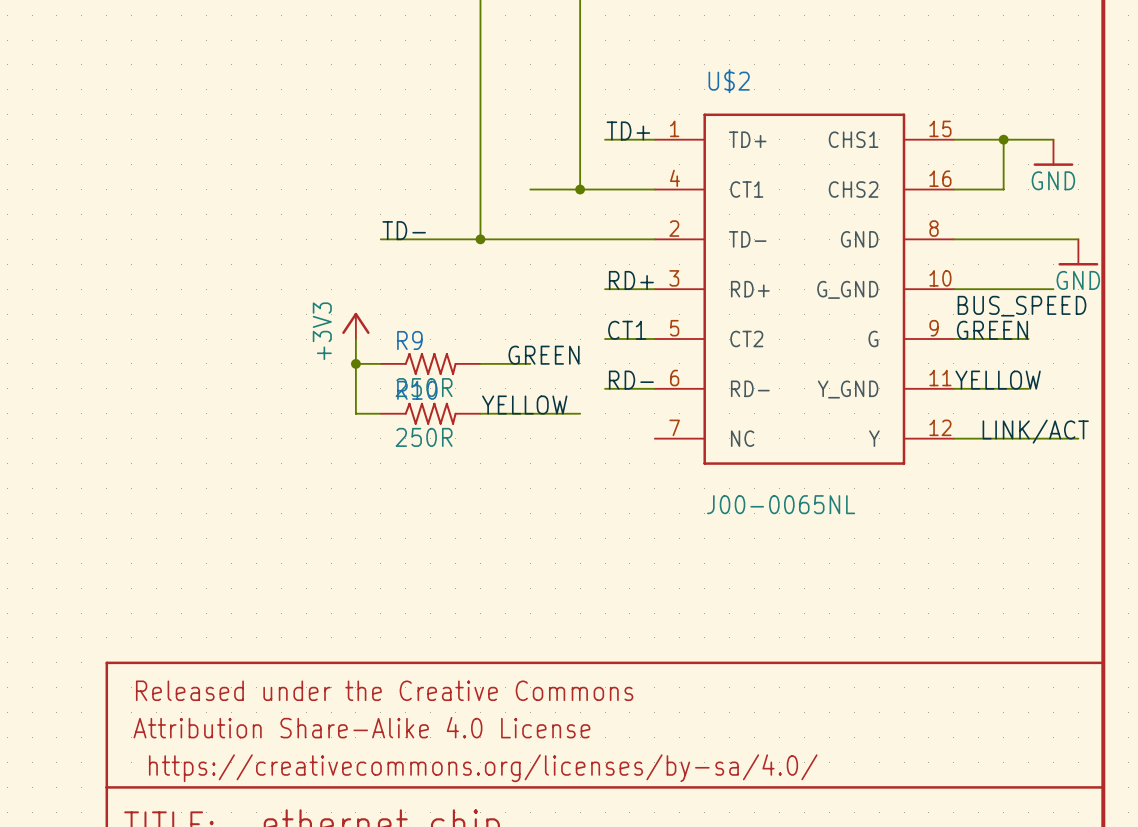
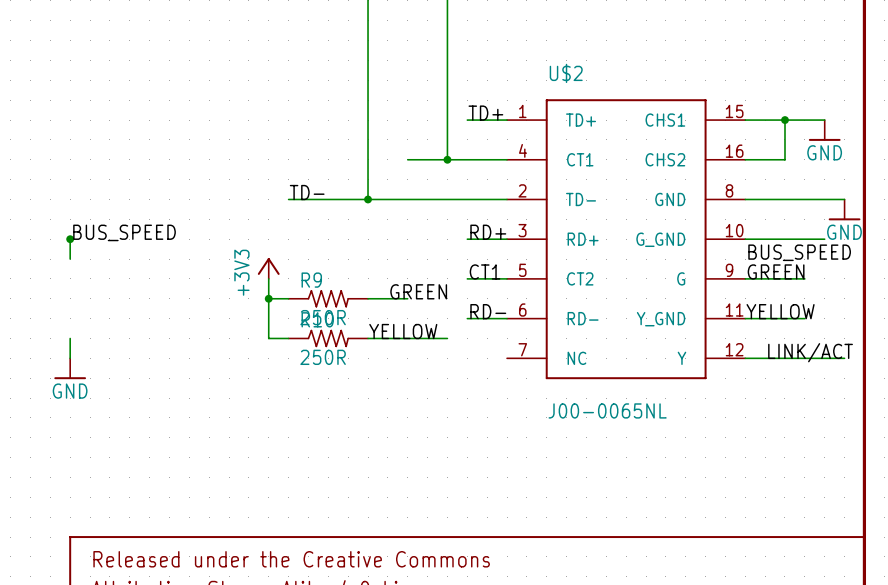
label: none -> BUS_SPEED (124, 232)
wire: none -> (70, 239) (70, 259)
junction: none -> (70, 239)
wire: none -> (70, 338) (70, 358)
power symbol: none -> GND (70, 368)

